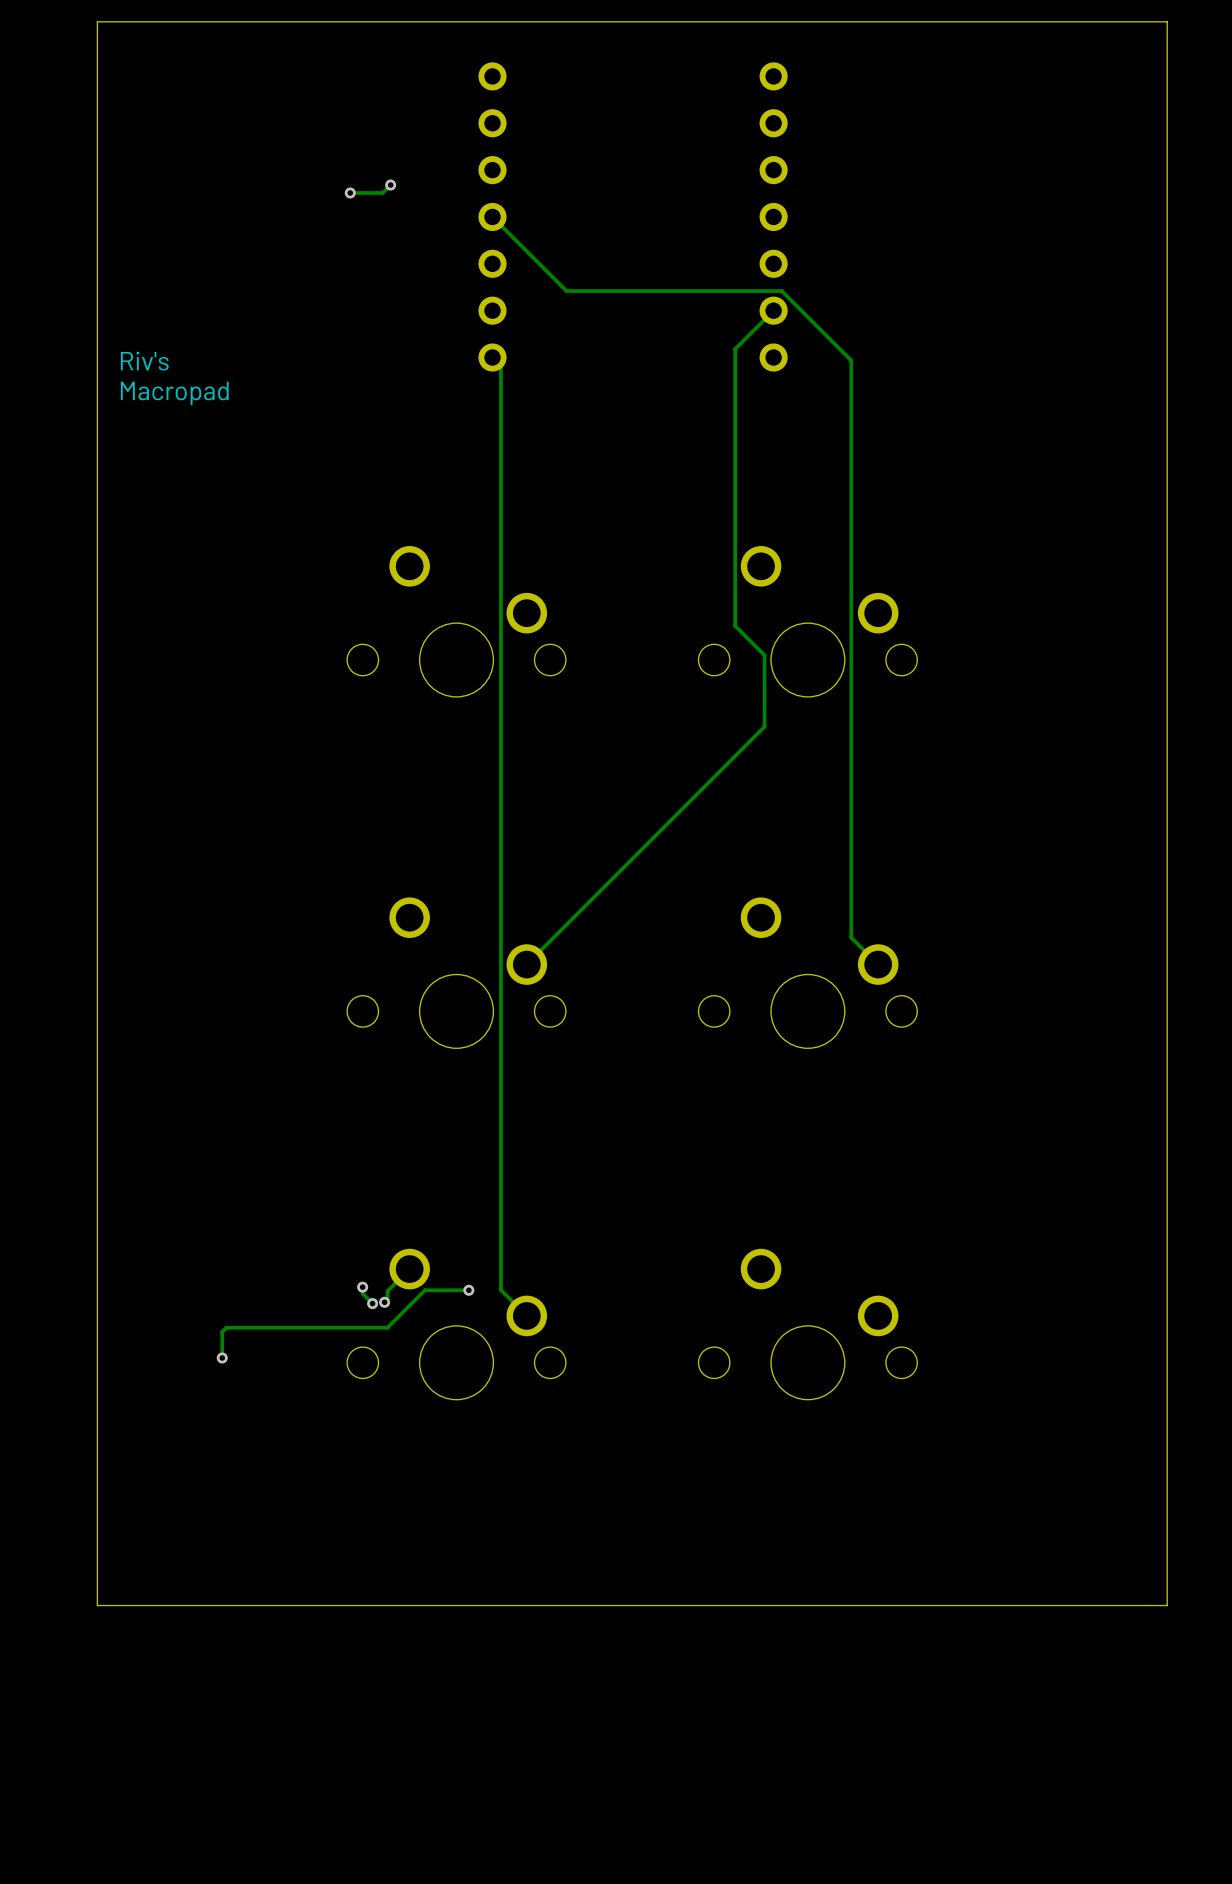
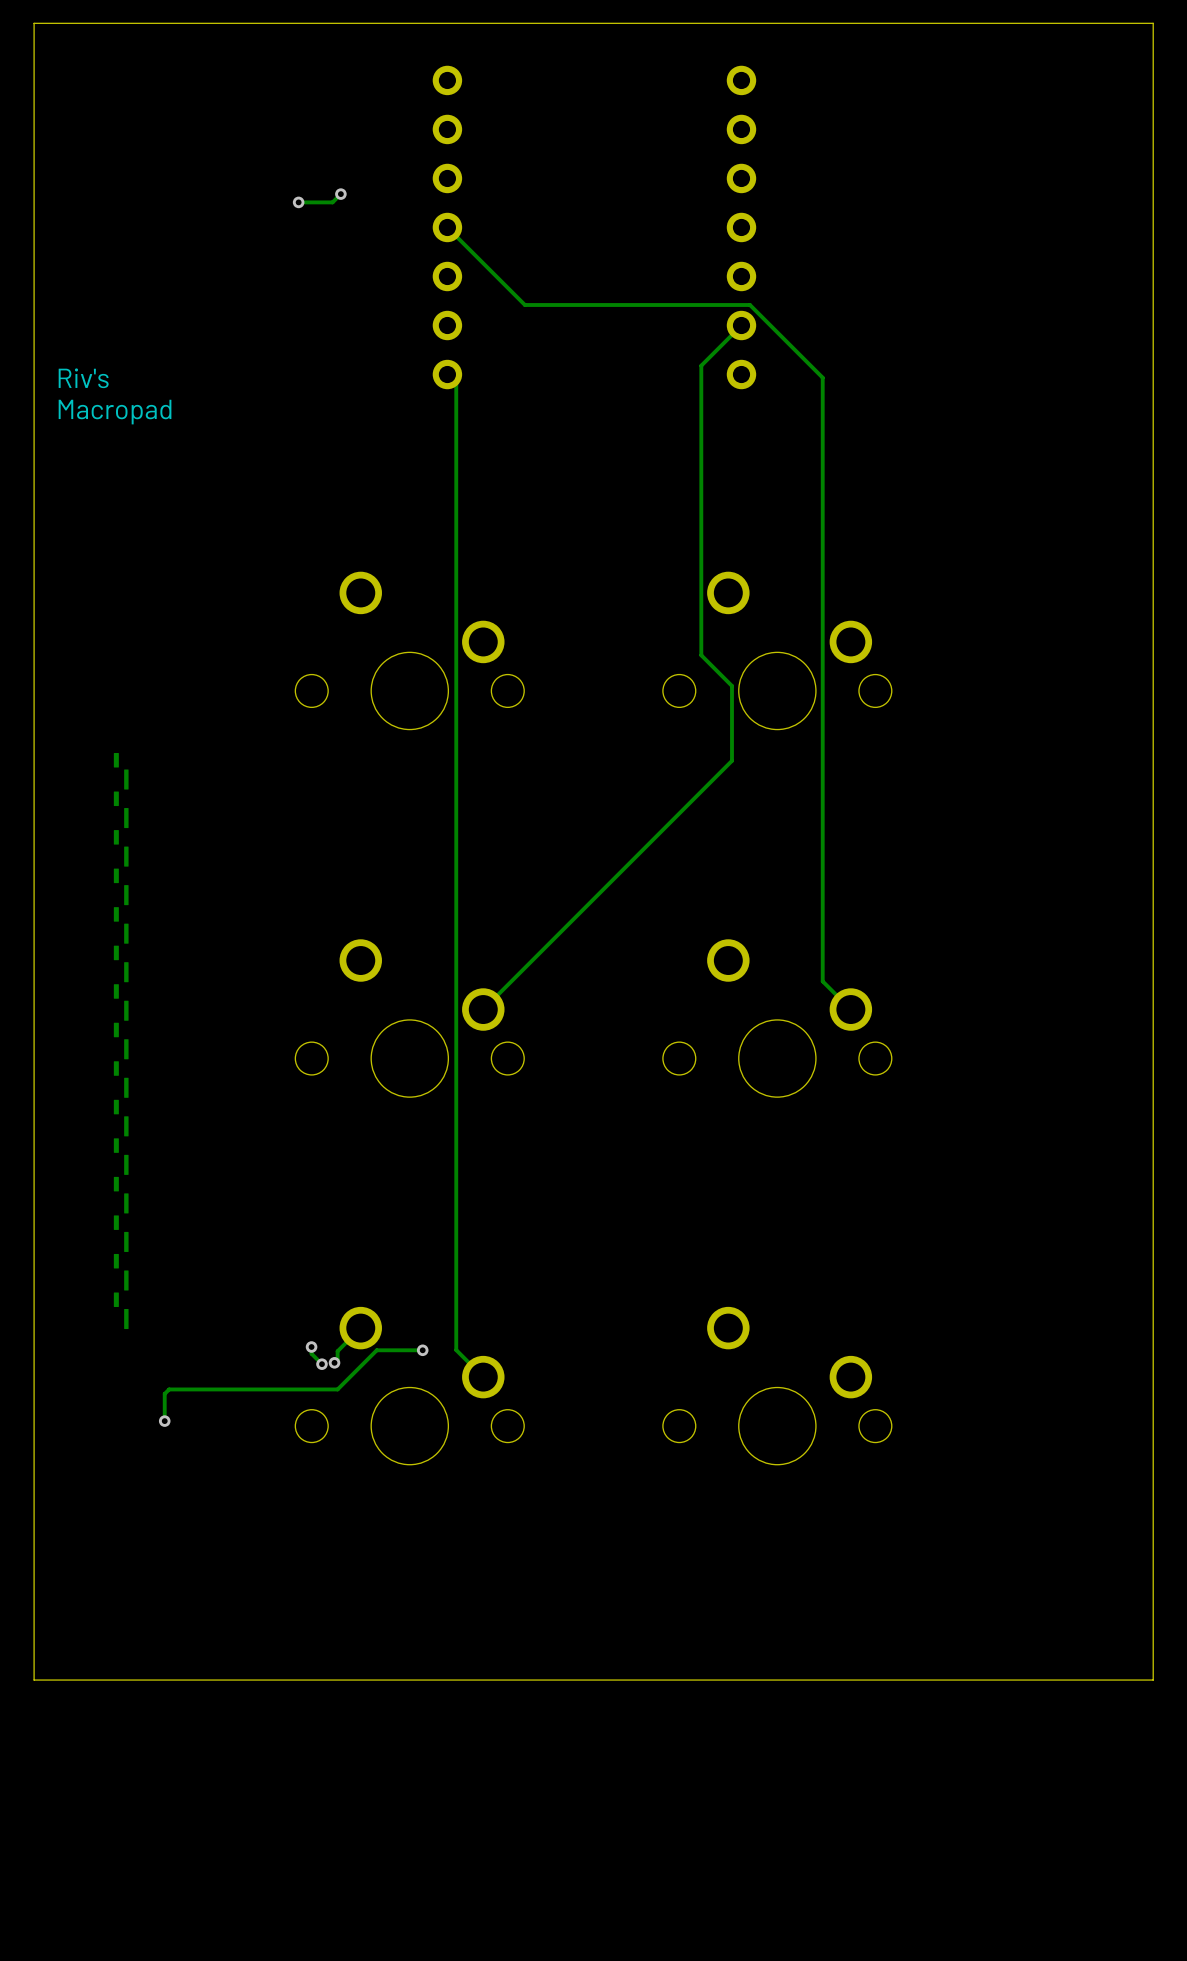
text: none -> _-_-_-_-_-_-_-_-_-_-_-_-_-_-_- (121, 1041)

